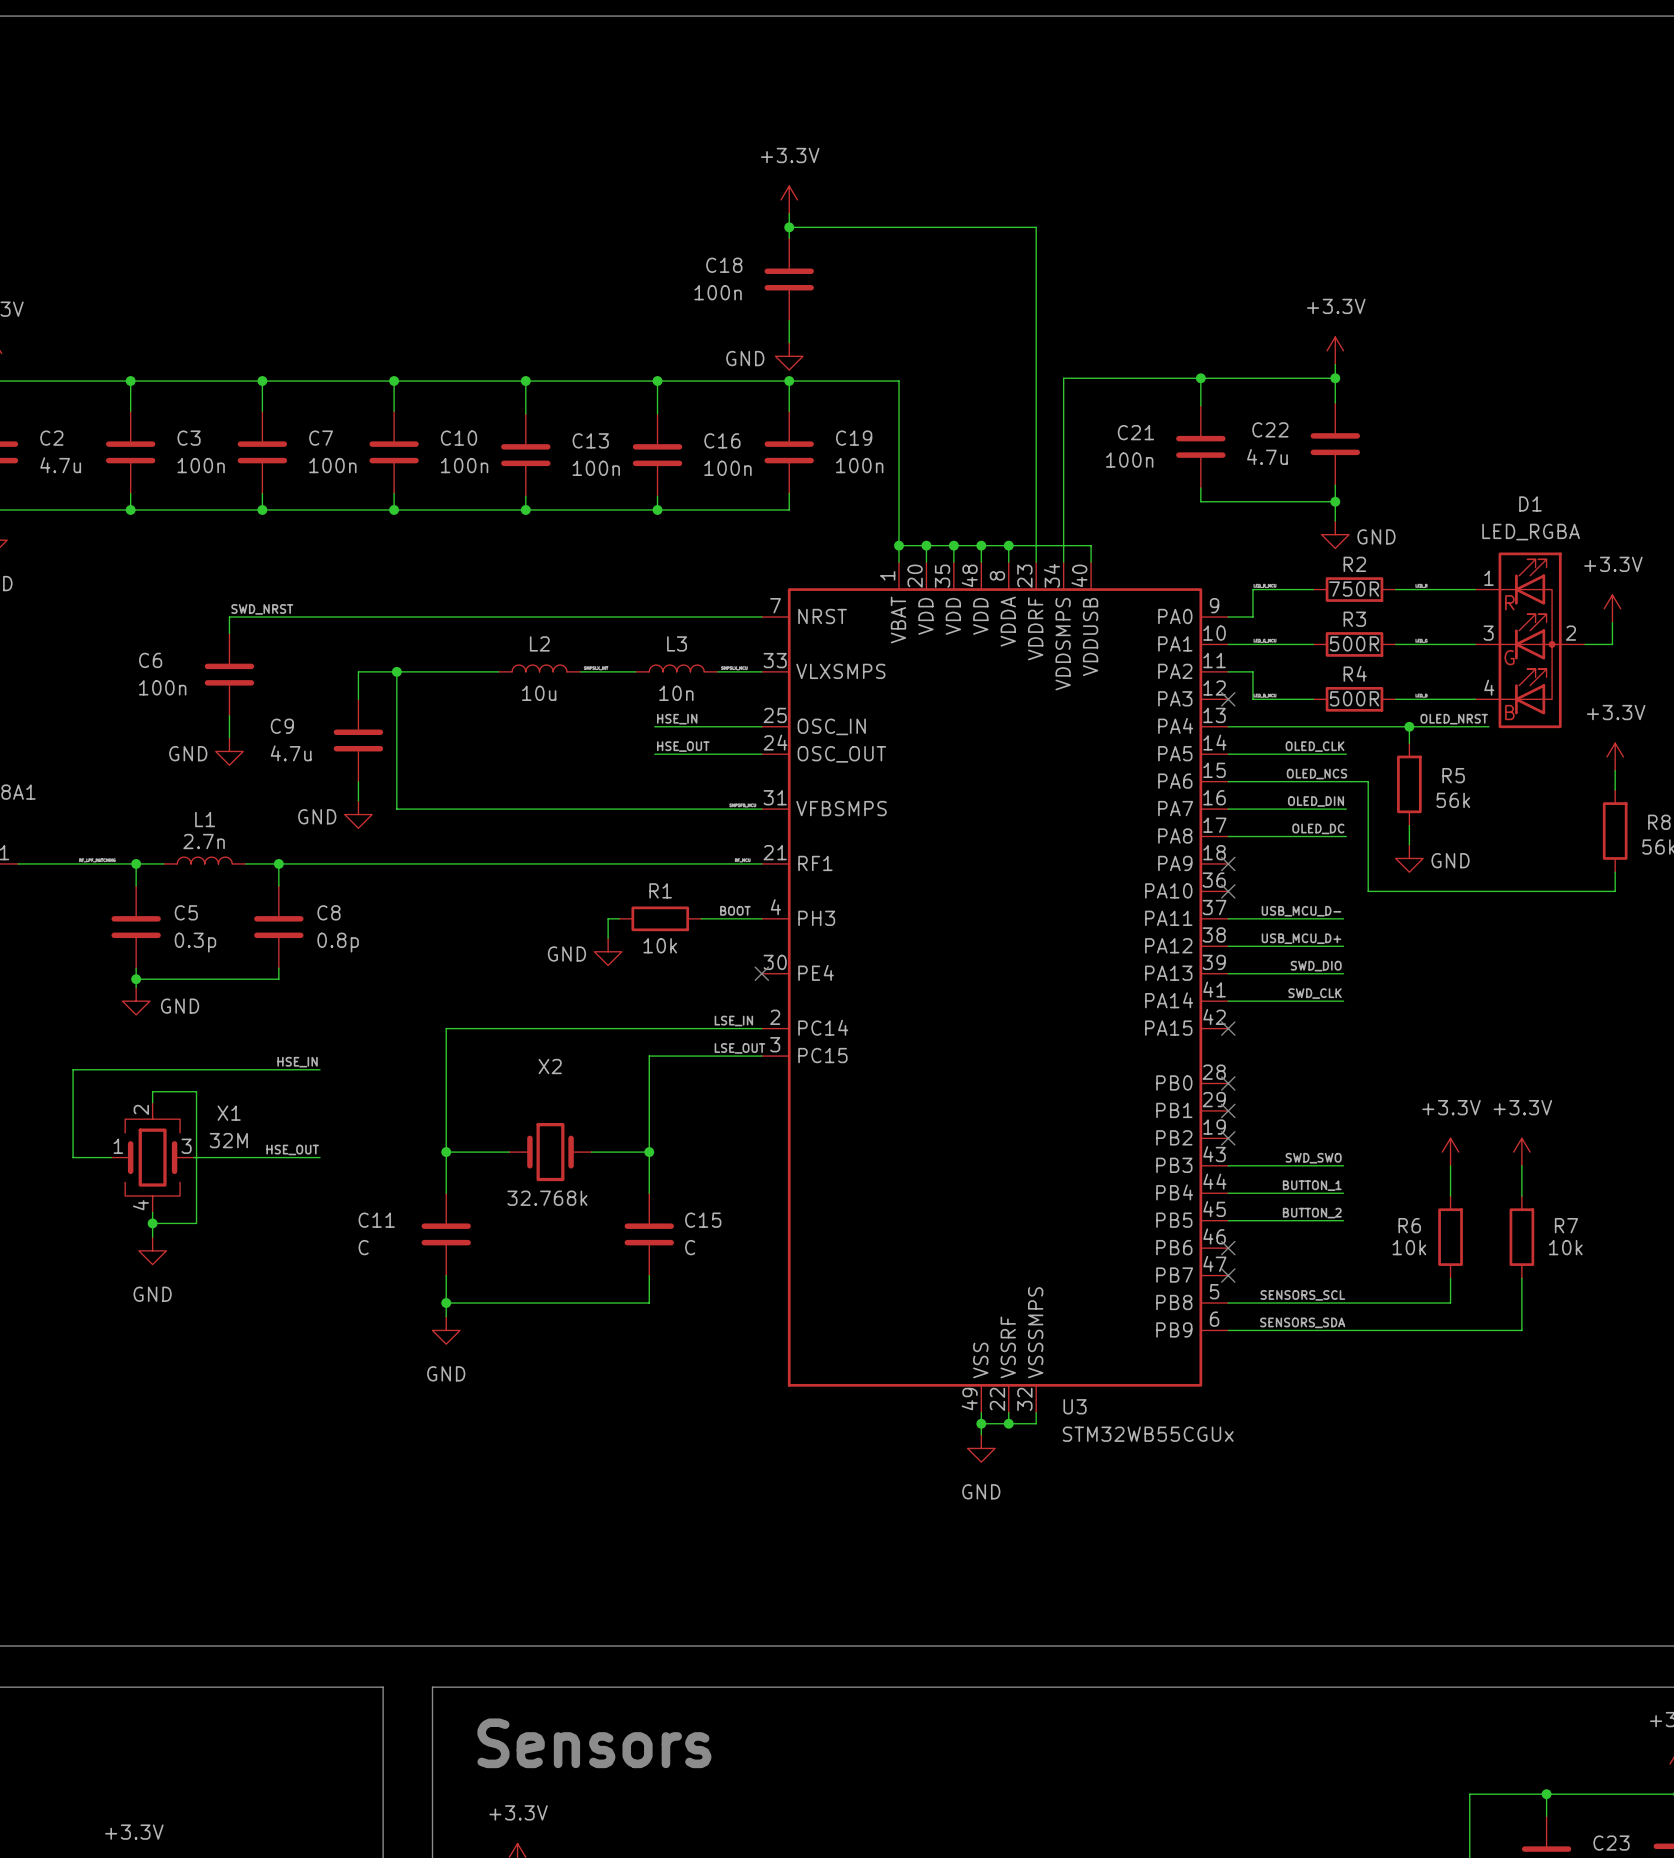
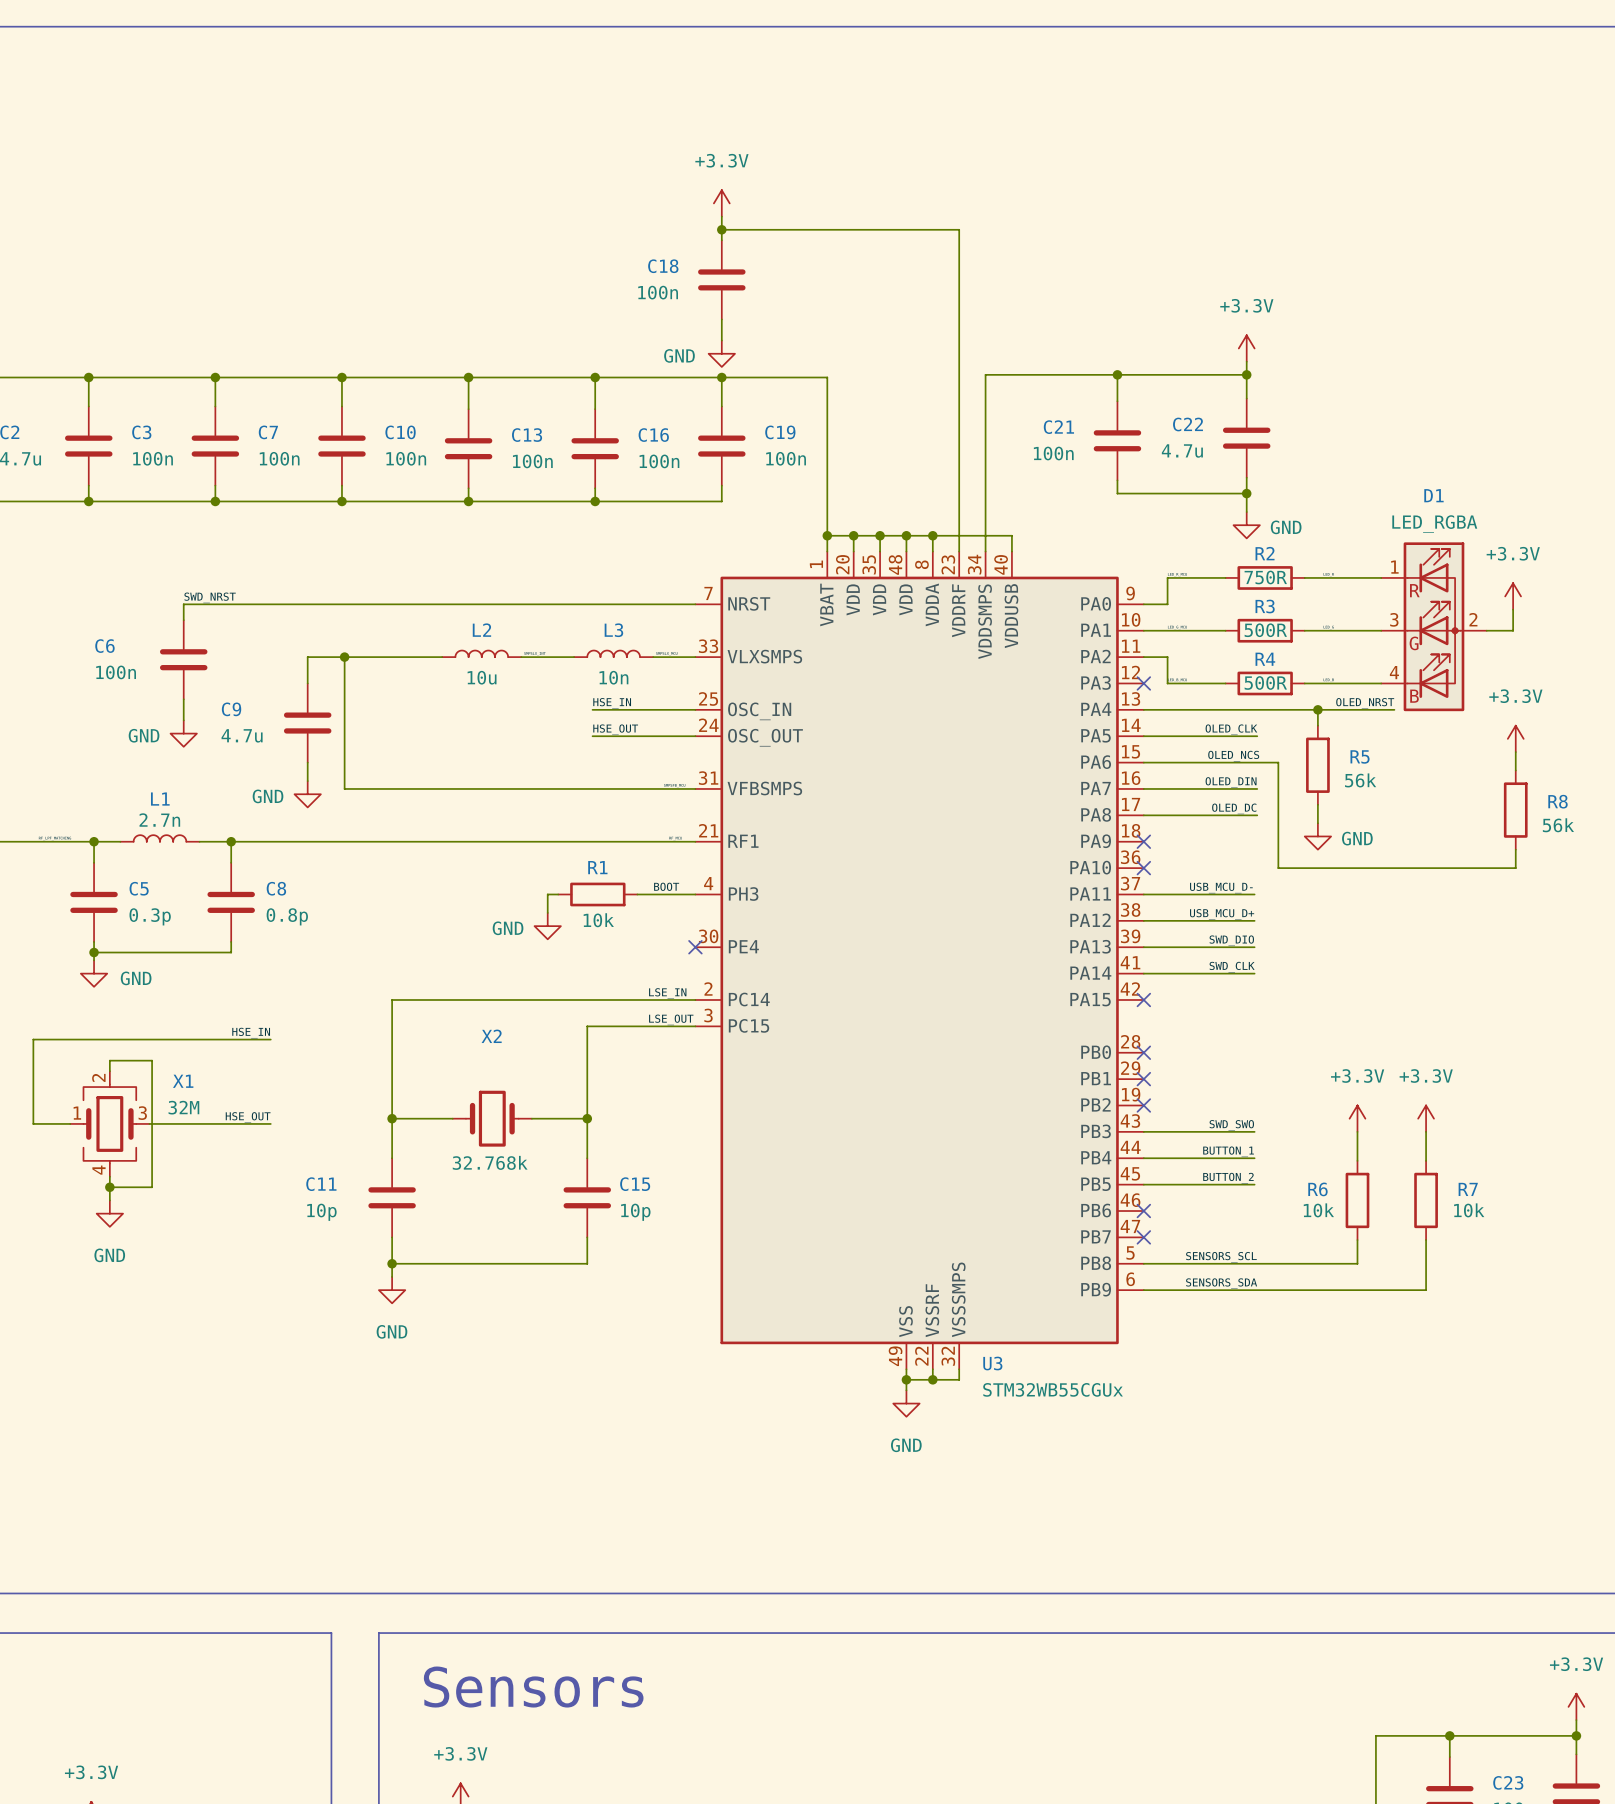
C11 value: C (363, 1247) -> 10p (321, 1212)
C15 value: C (690, 1247) -> 10p (635, 1212)

